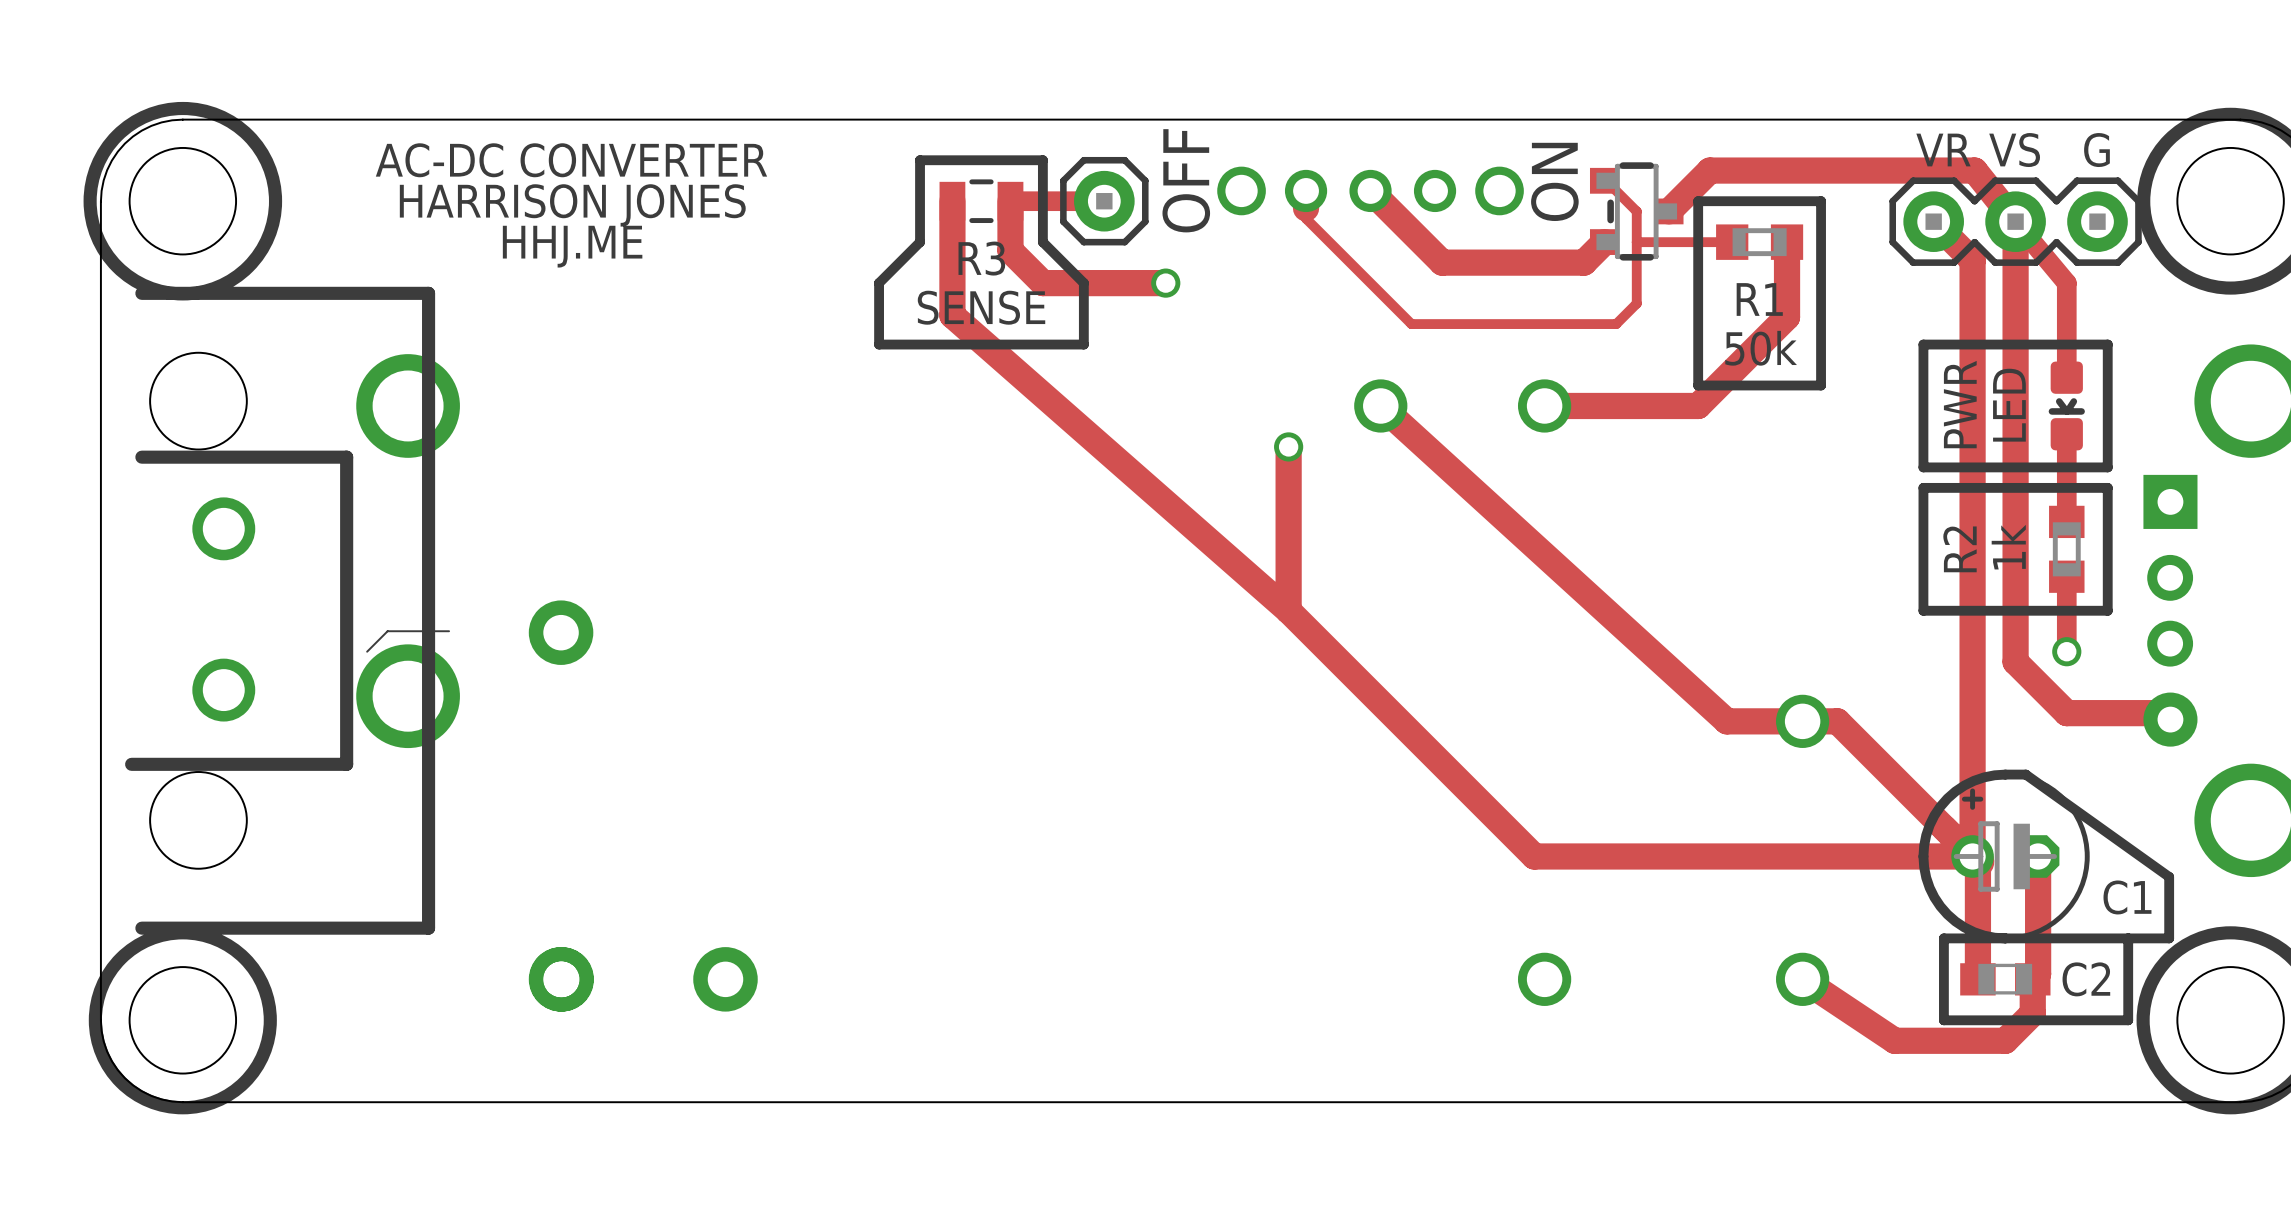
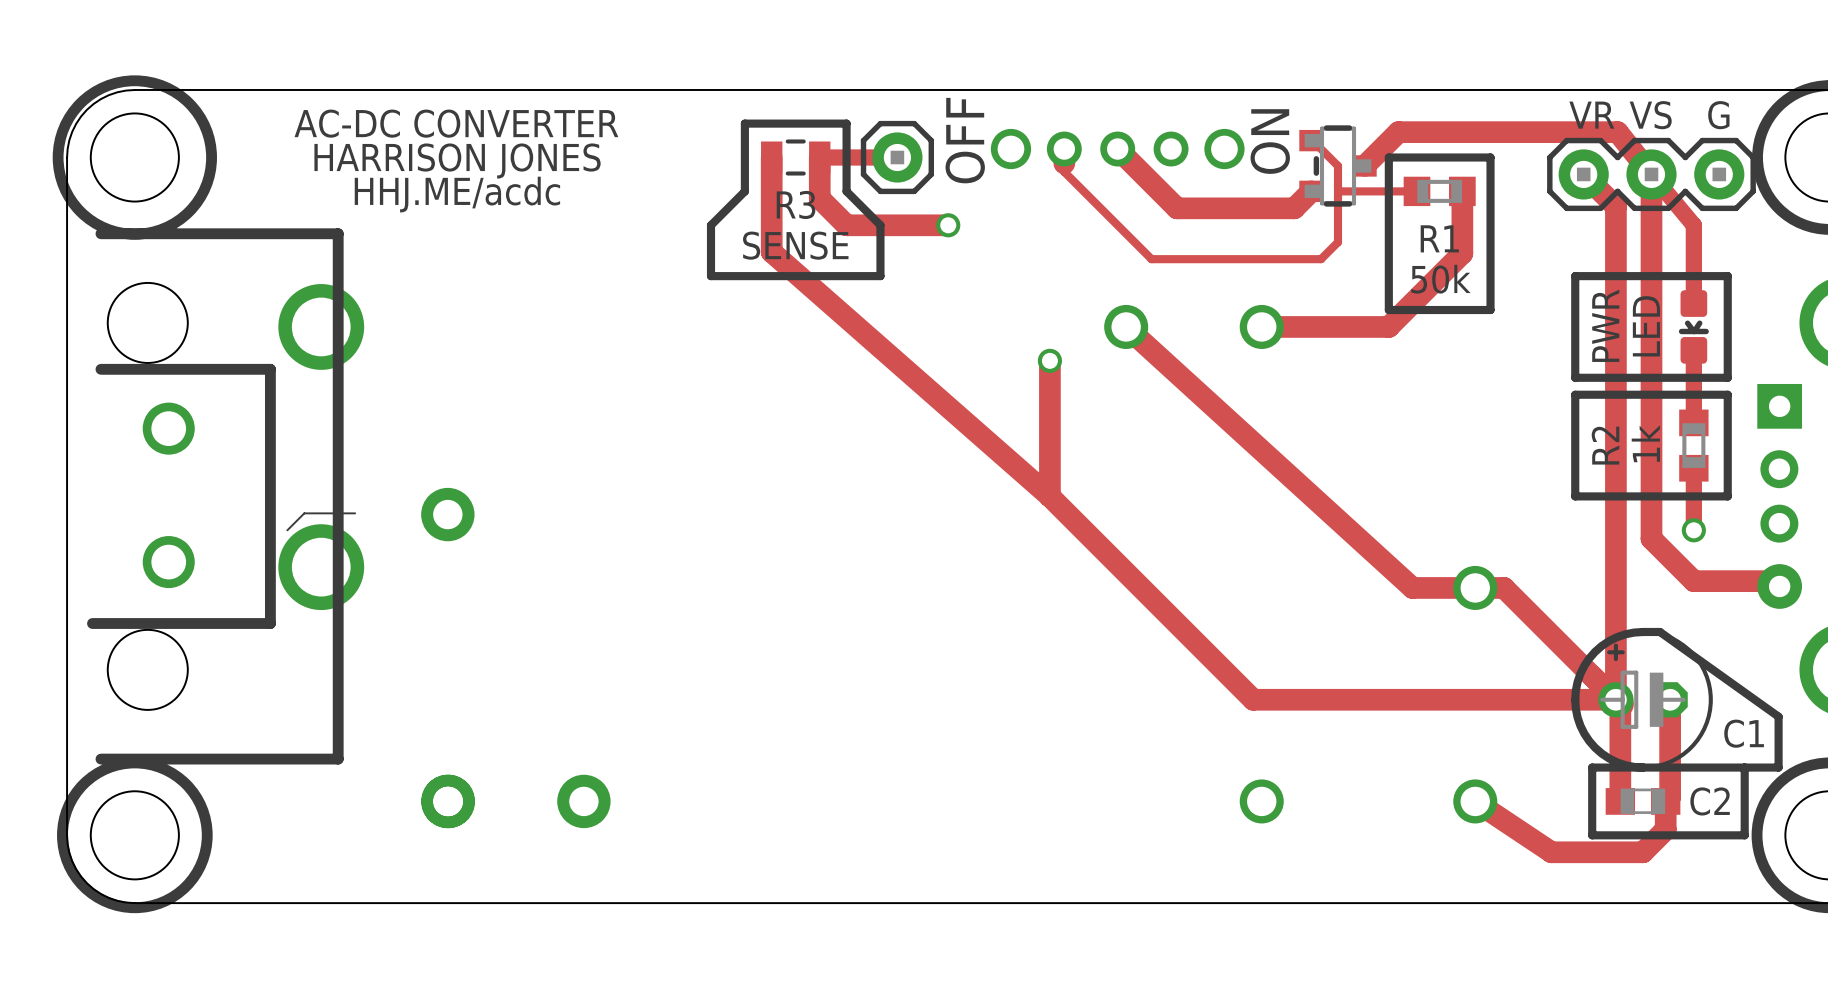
text: HHJ.ME (572, 246) -> HHJ.ME/acdc (457, 194)

